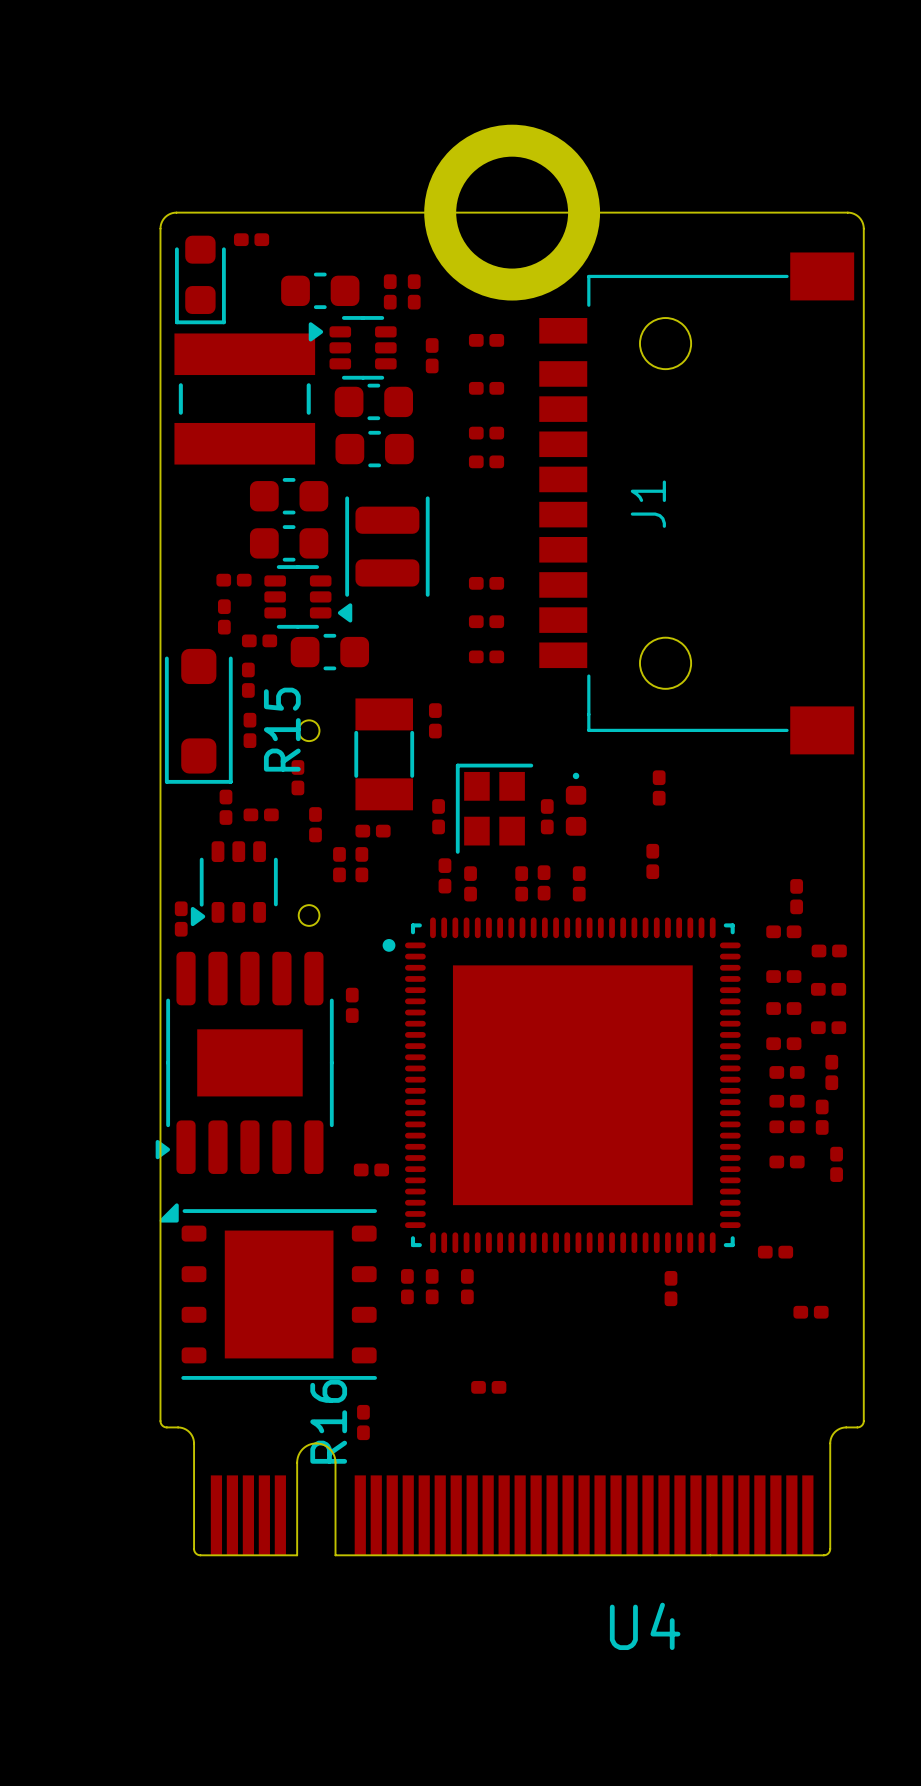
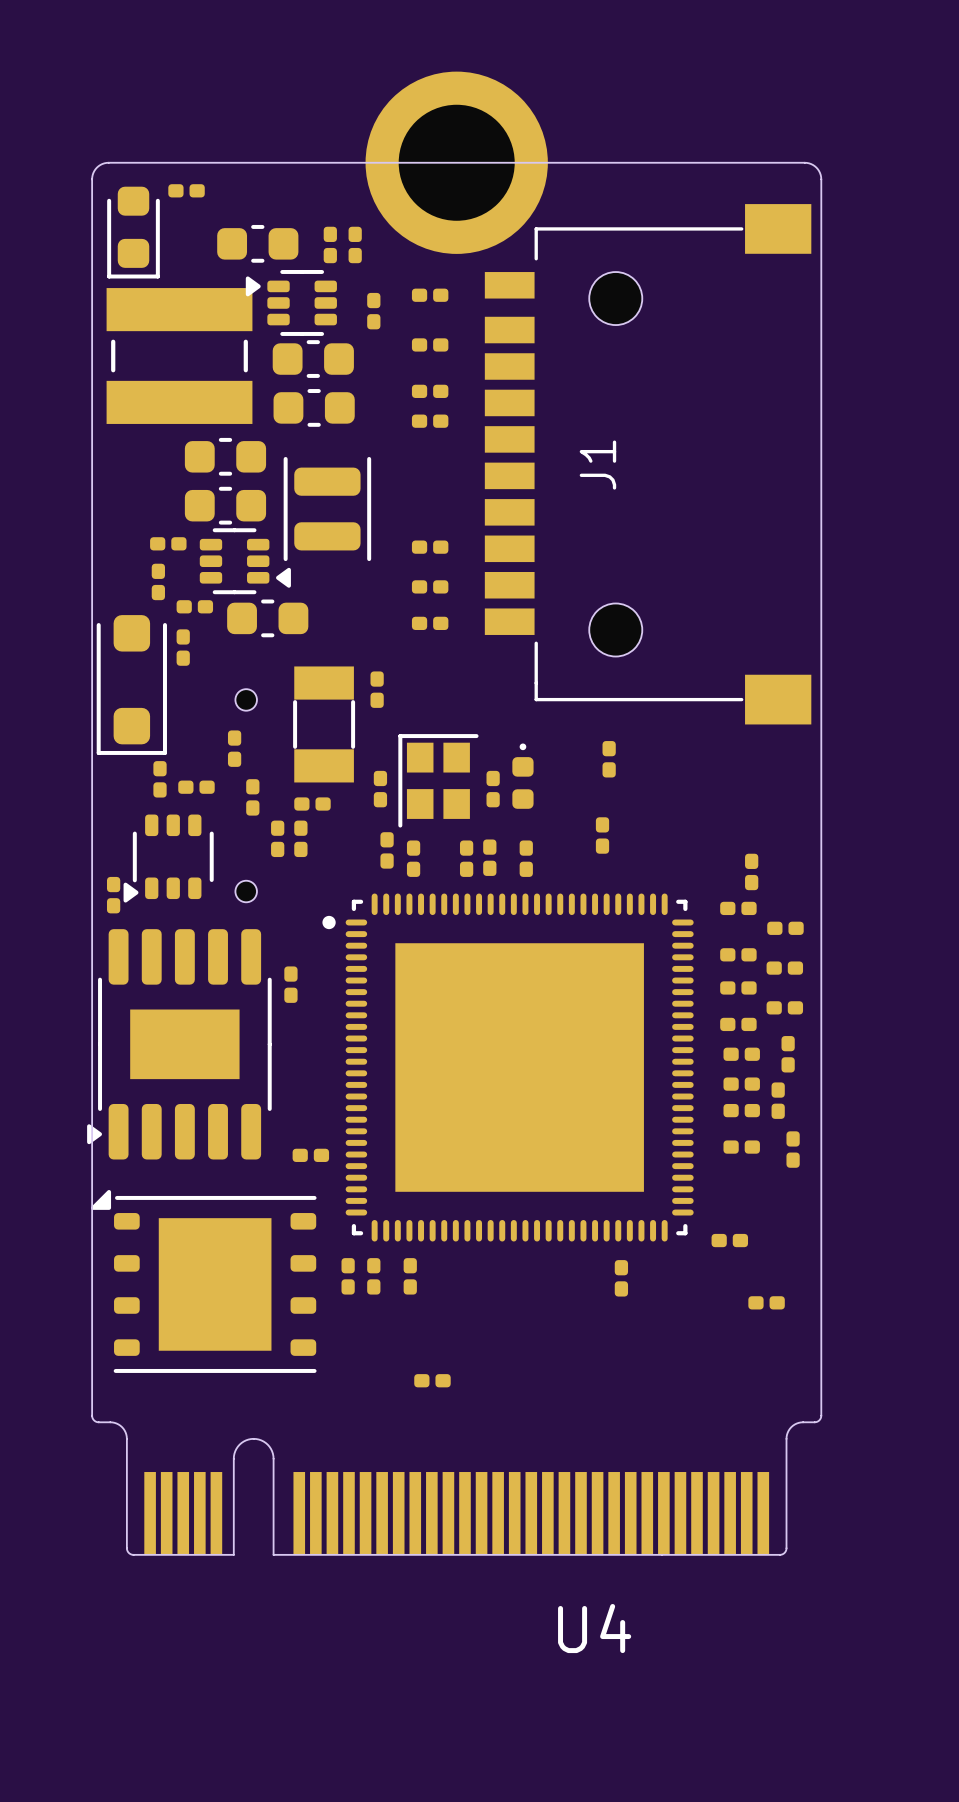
R15: (249, 730) -> none
R16: (363, 1422) -> none

